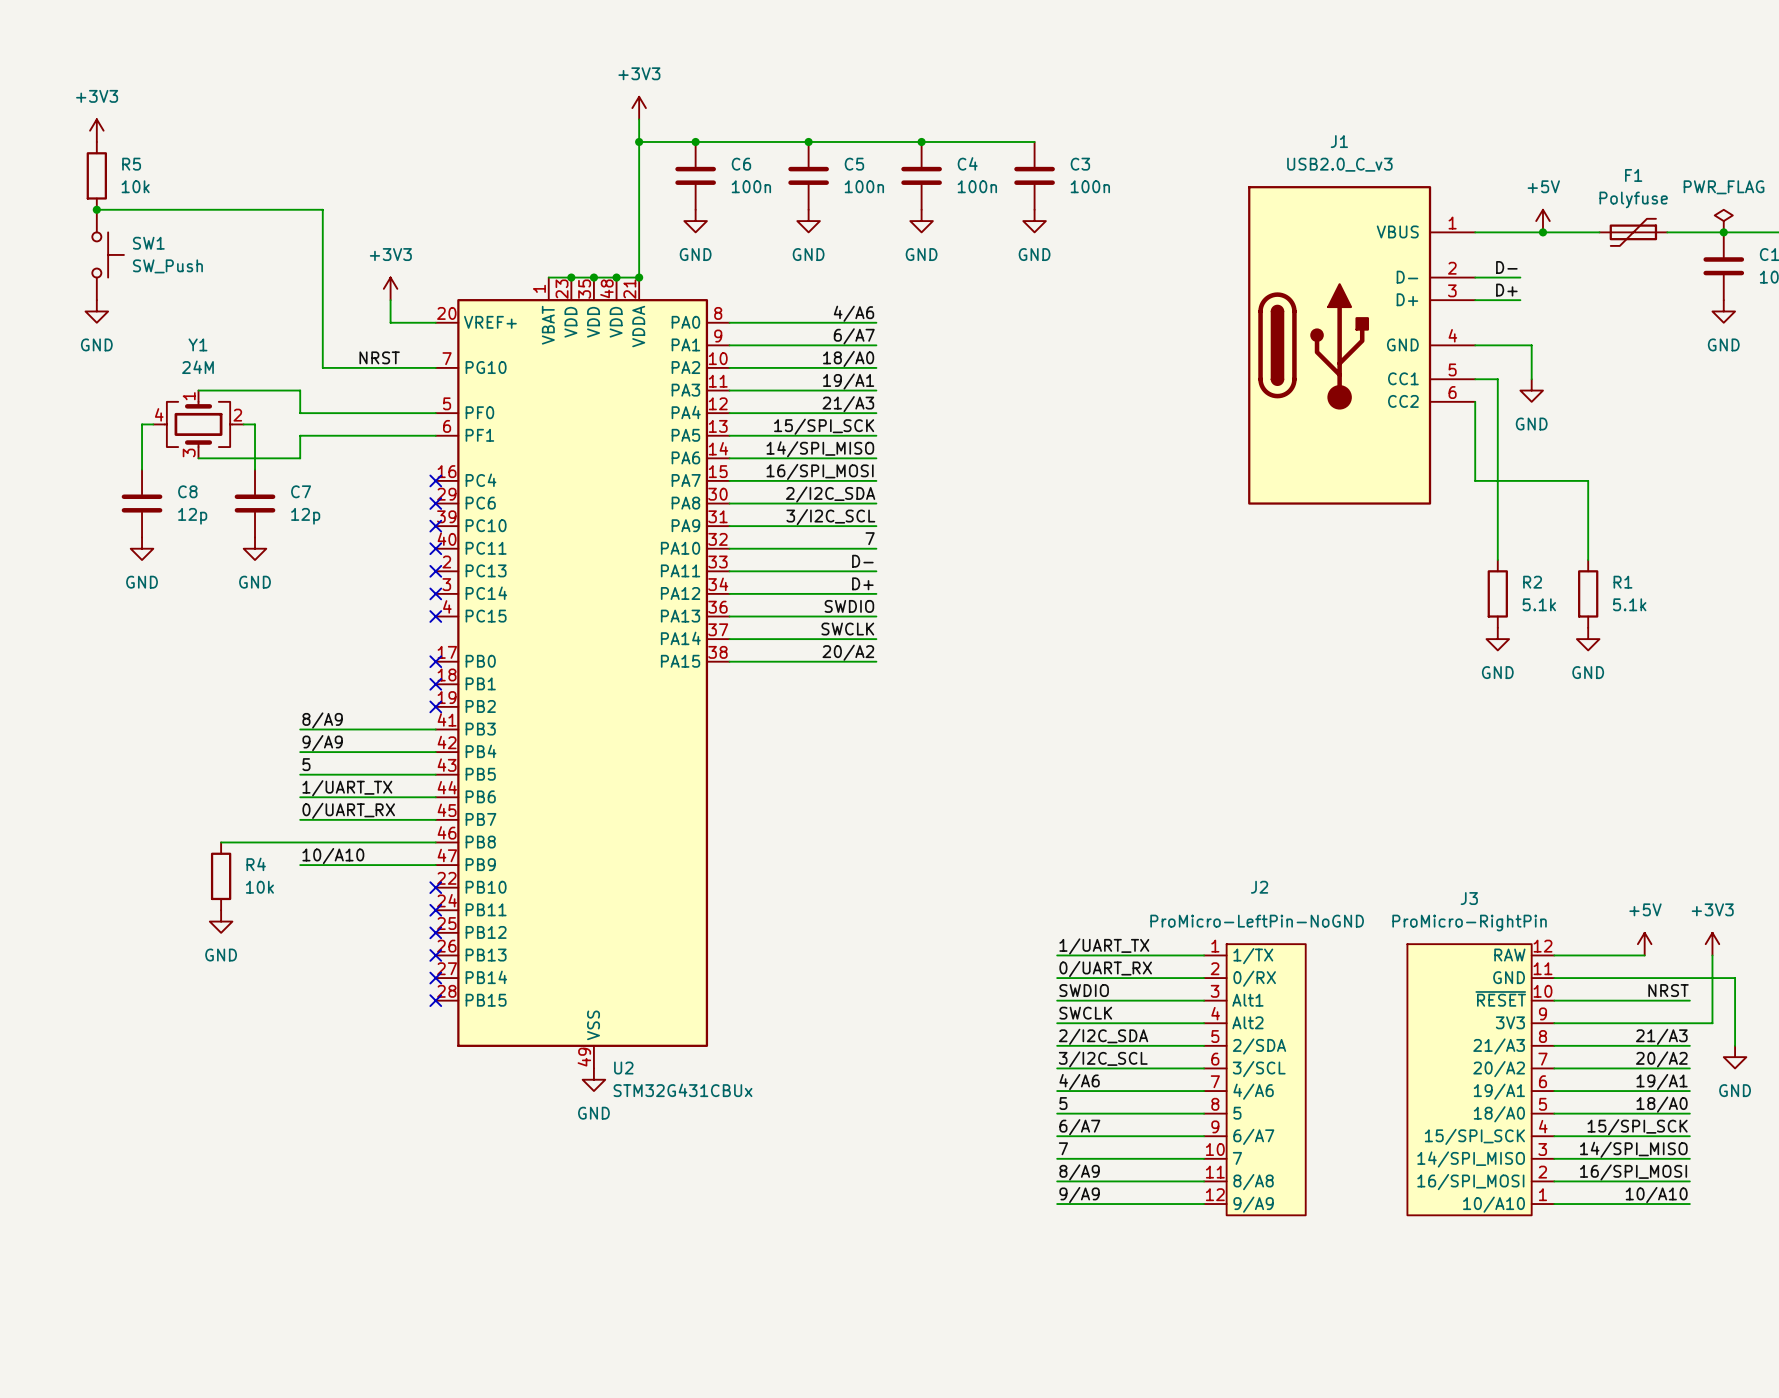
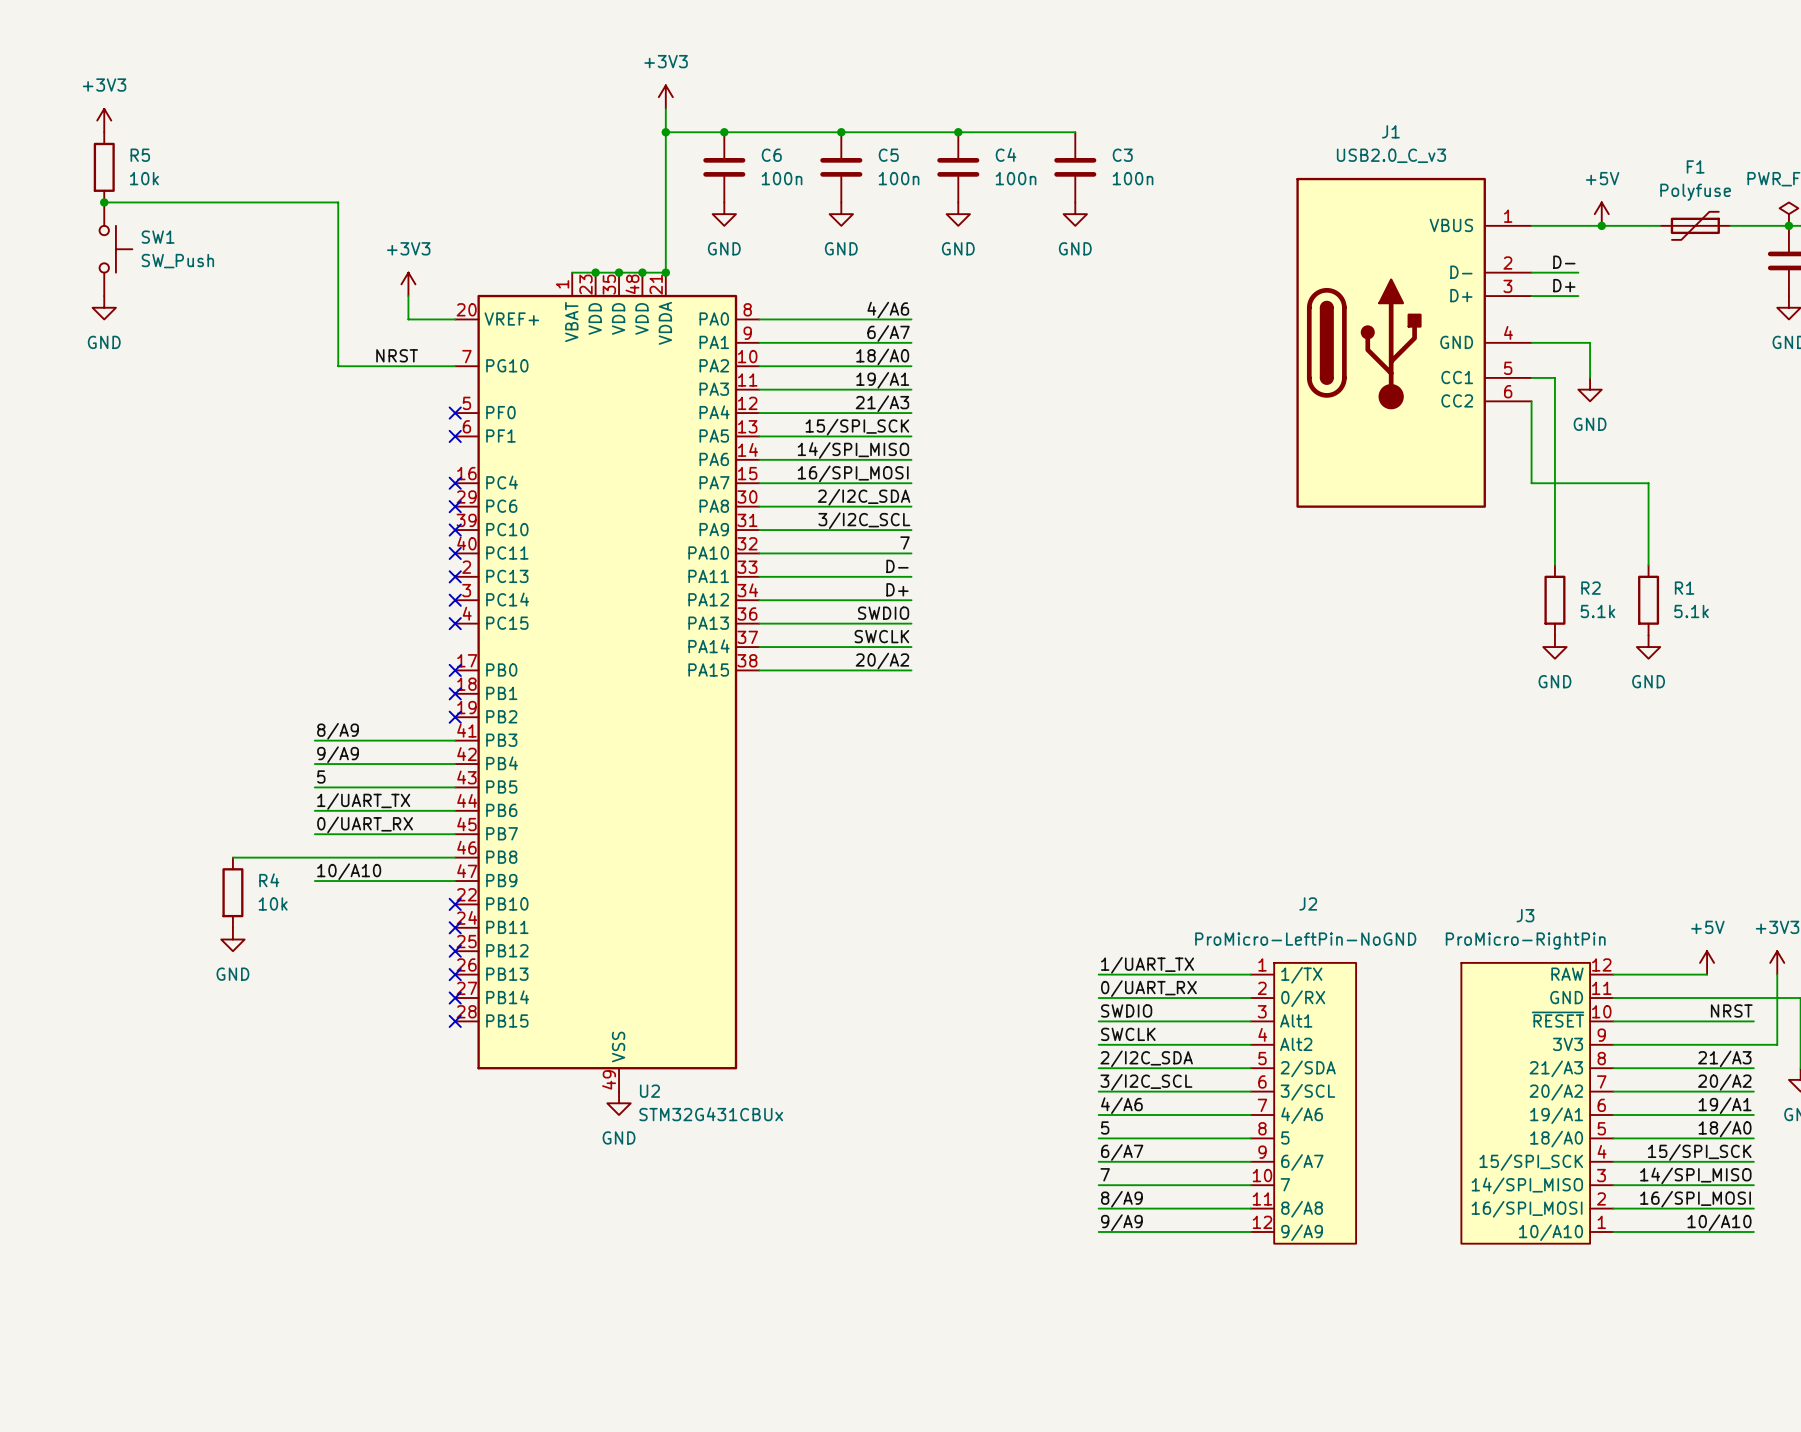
wire: (198, 390) (300, 390) (300, 413) (435, 413) -> none
no-connect mark: none -> (455, 413)
wire: (153, 424) (142, 424) (142, 469) -> none
Y1: 24M (198, 424) -> none
wire: (243, 424) (255, 424) (255, 469) -> none
wire: (435, 435) (300, 435) (300, 458) (198, 458) -> none
no-connect mark: none -> (455, 436)
C8: 12p (142, 503) -> none
C7: 12p (255, 503) -> none
power symbol: GND (142, 548) -> none
power symbol: GND (255, 548) -> none

